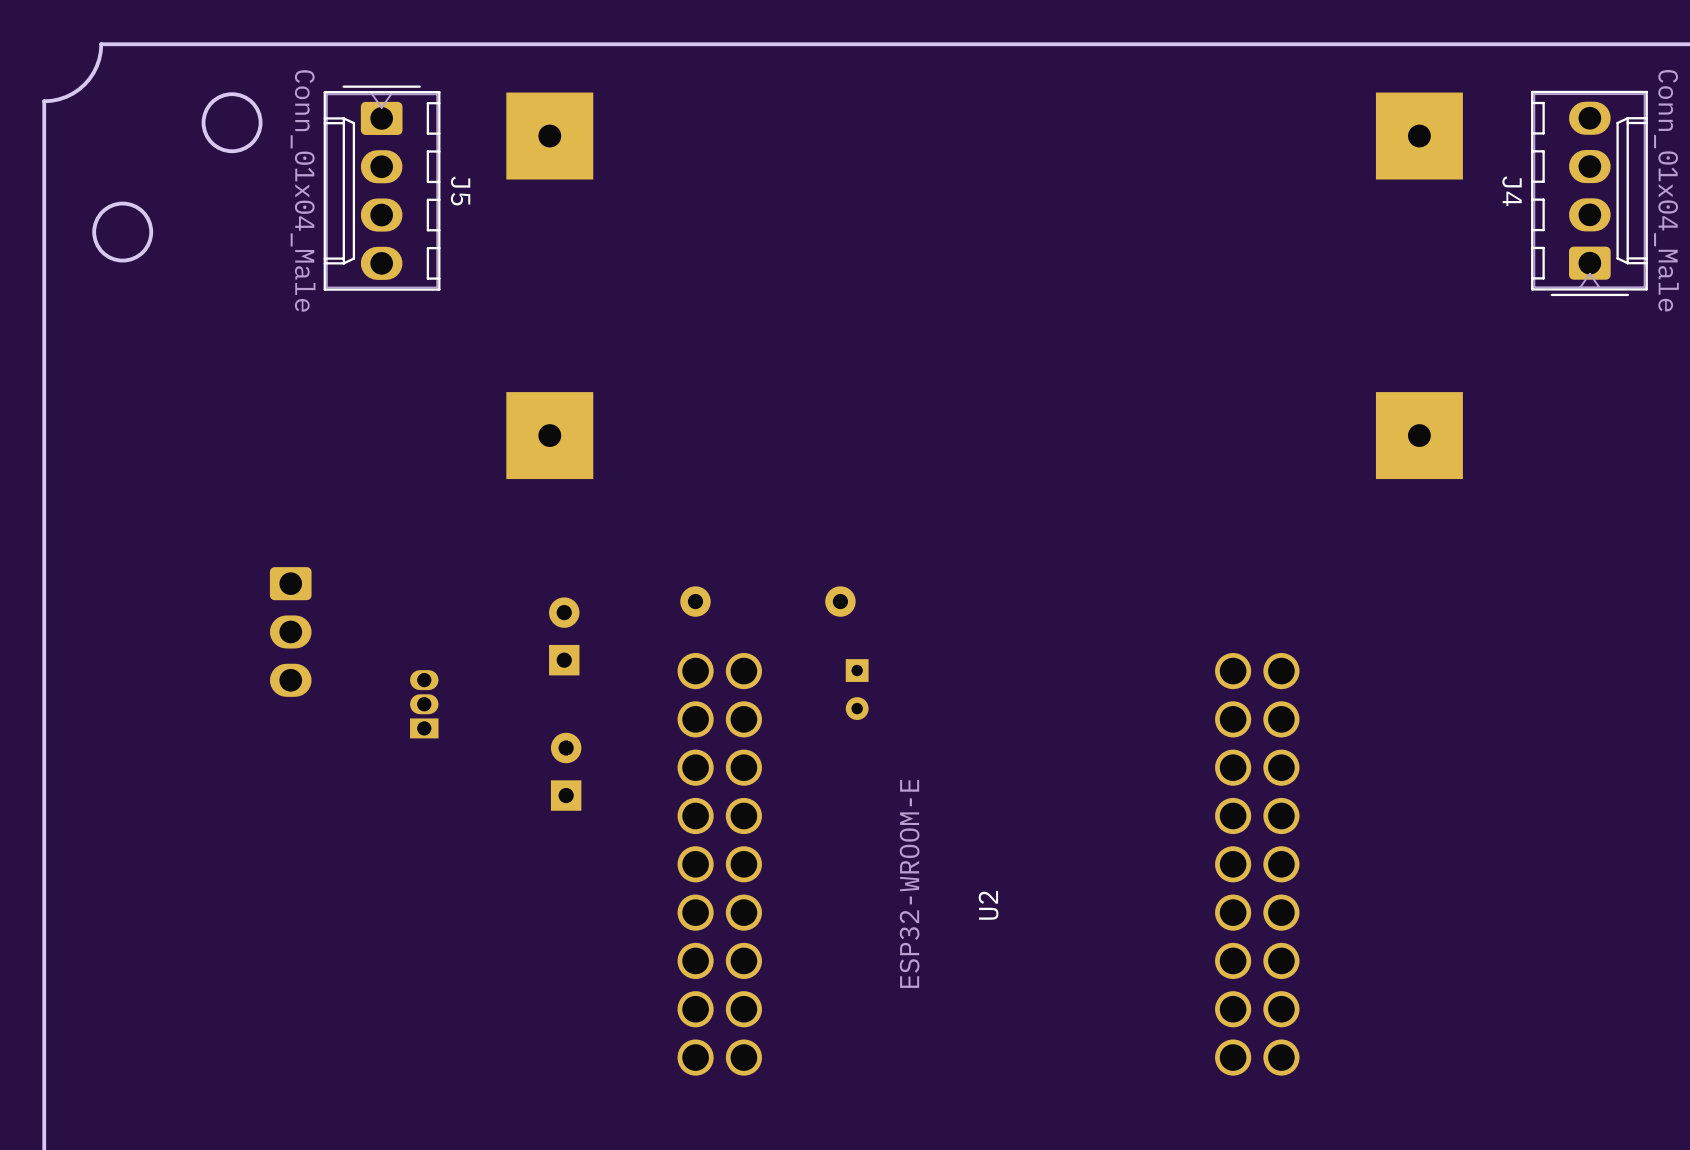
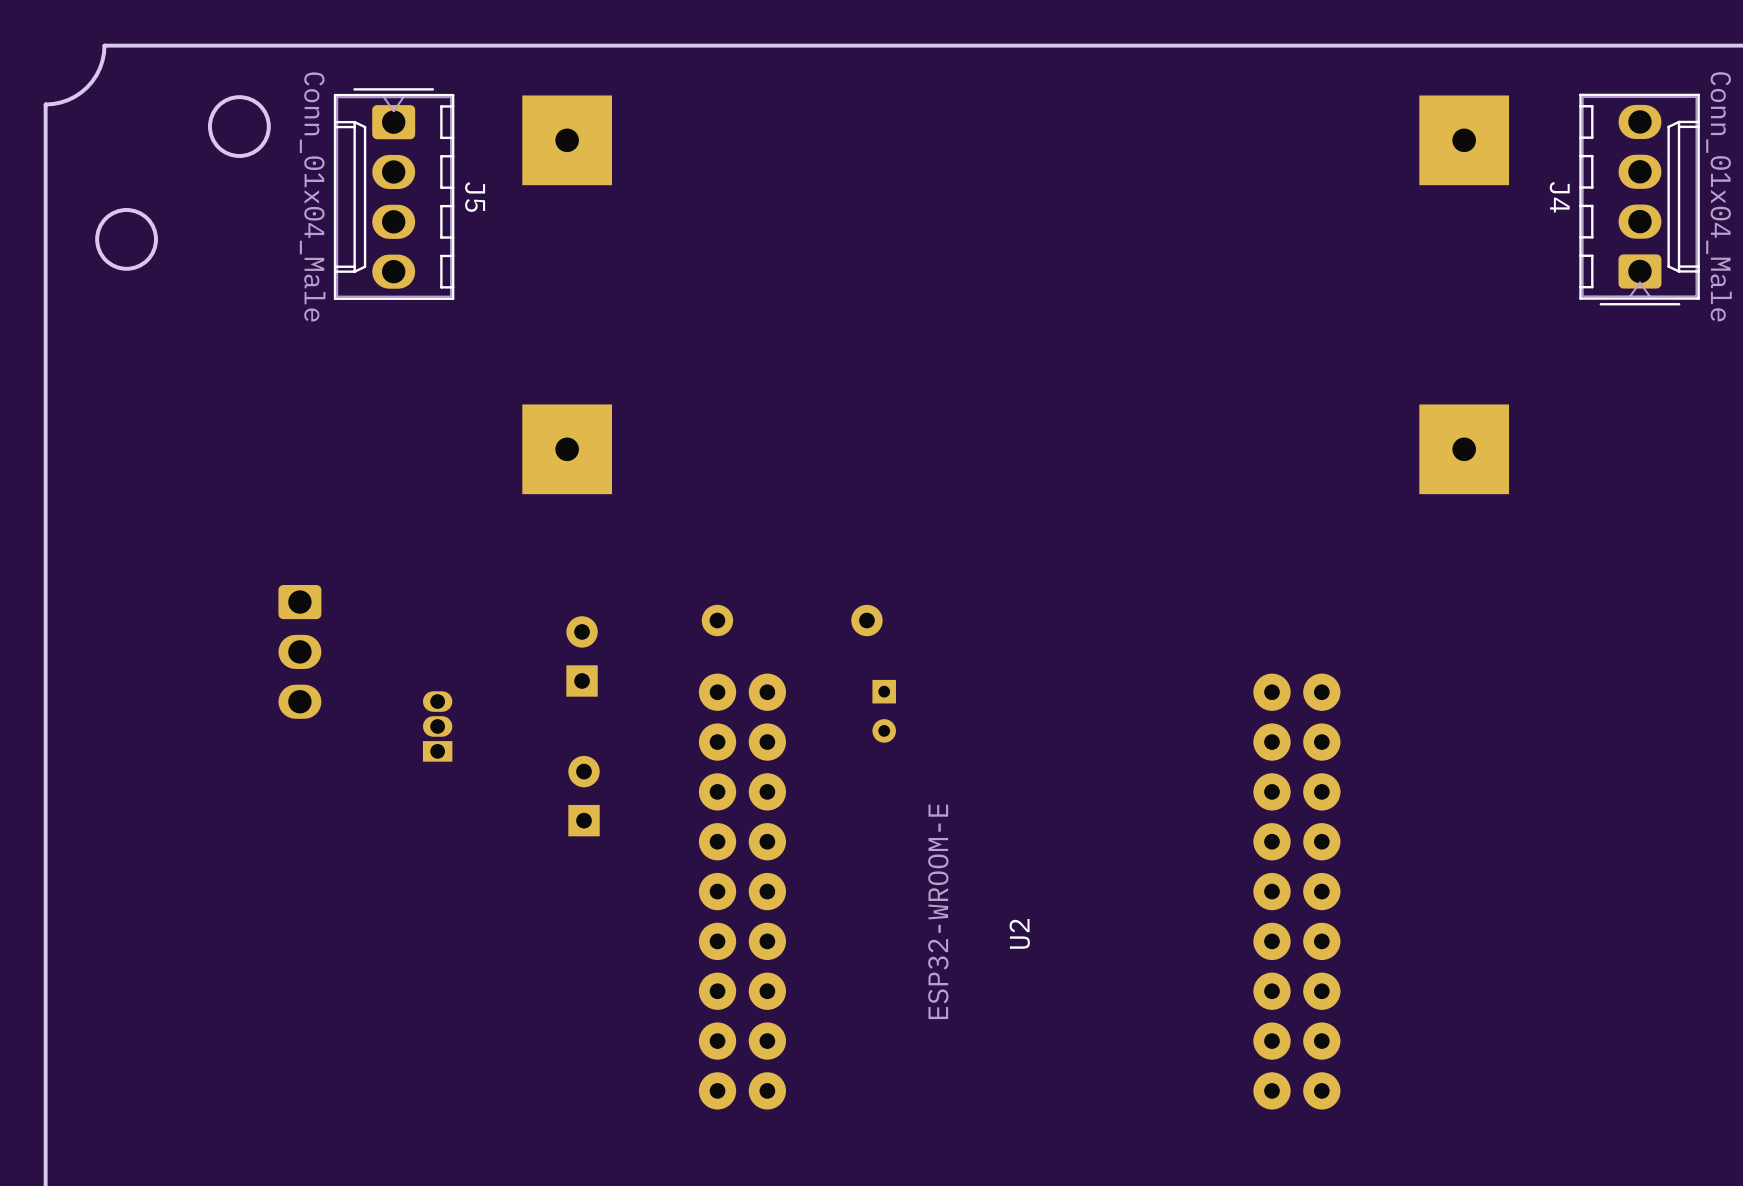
U2 footprint: [677, 652, 1300, 1076] -> [698, 673, 1341, 1110]

